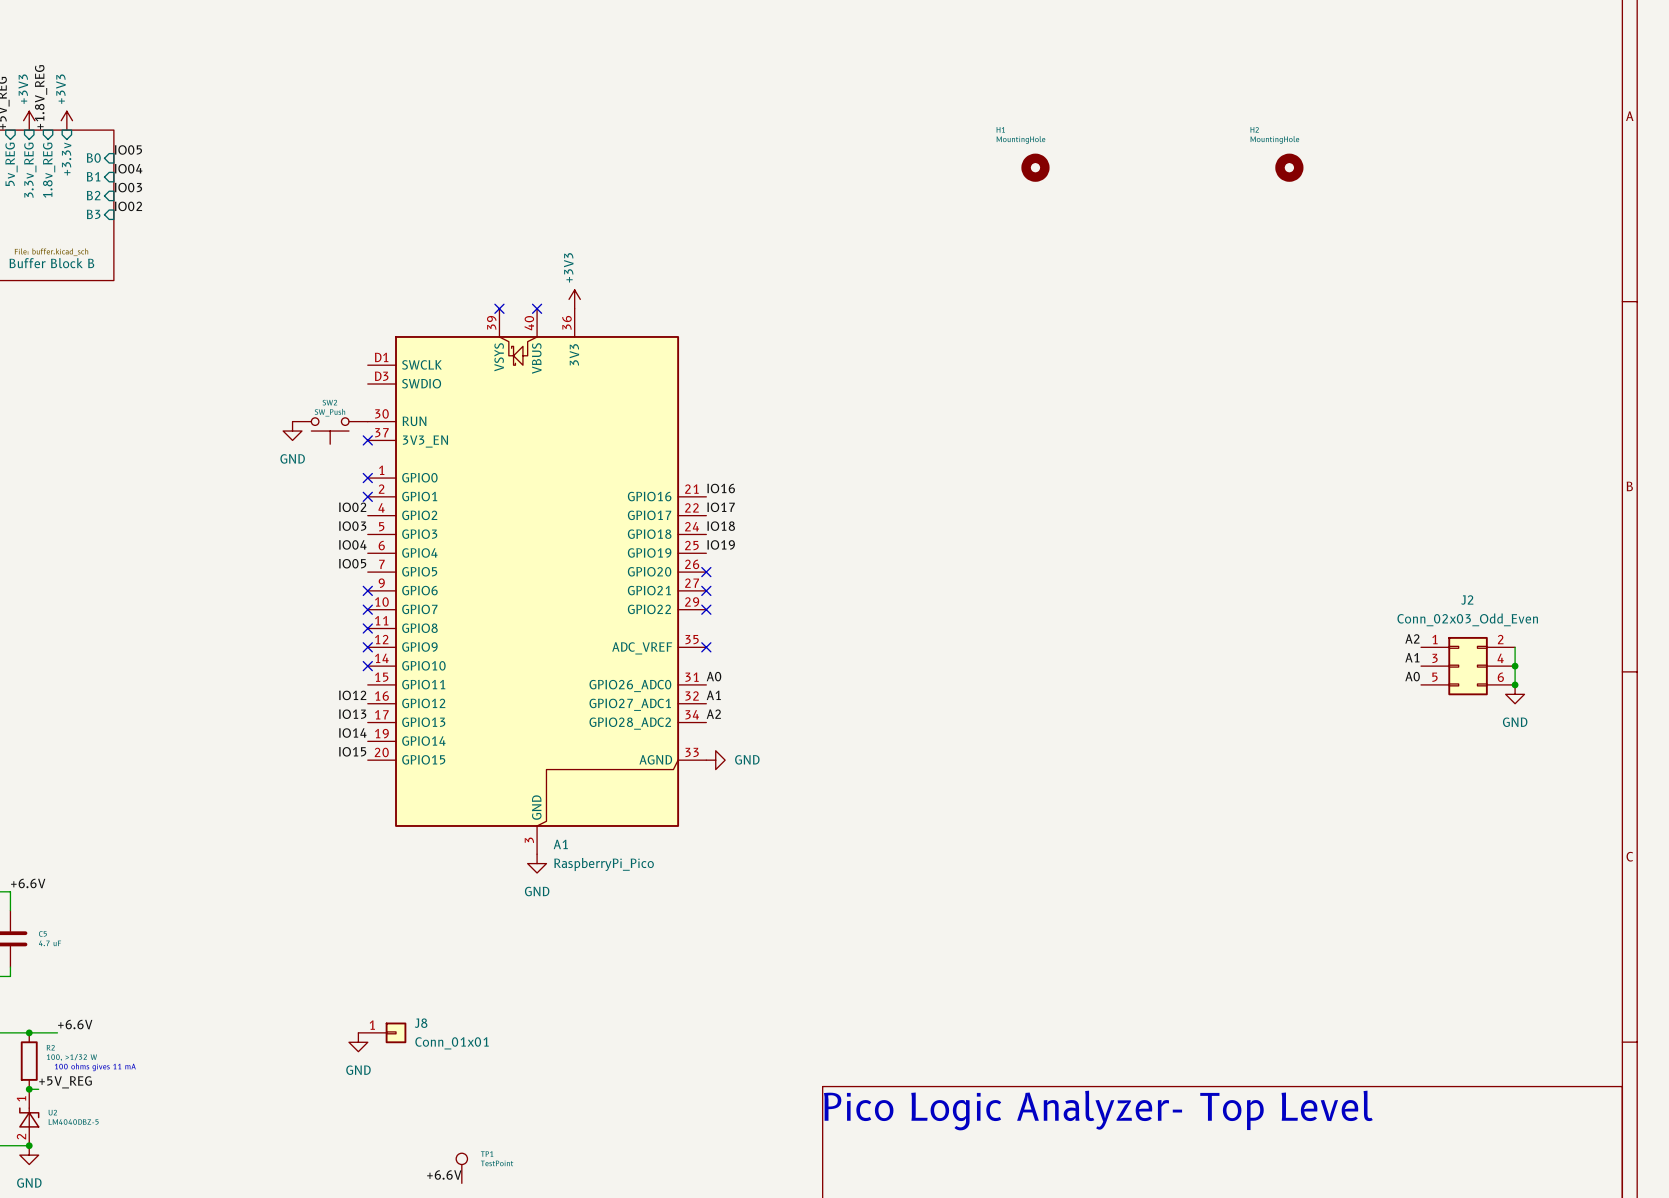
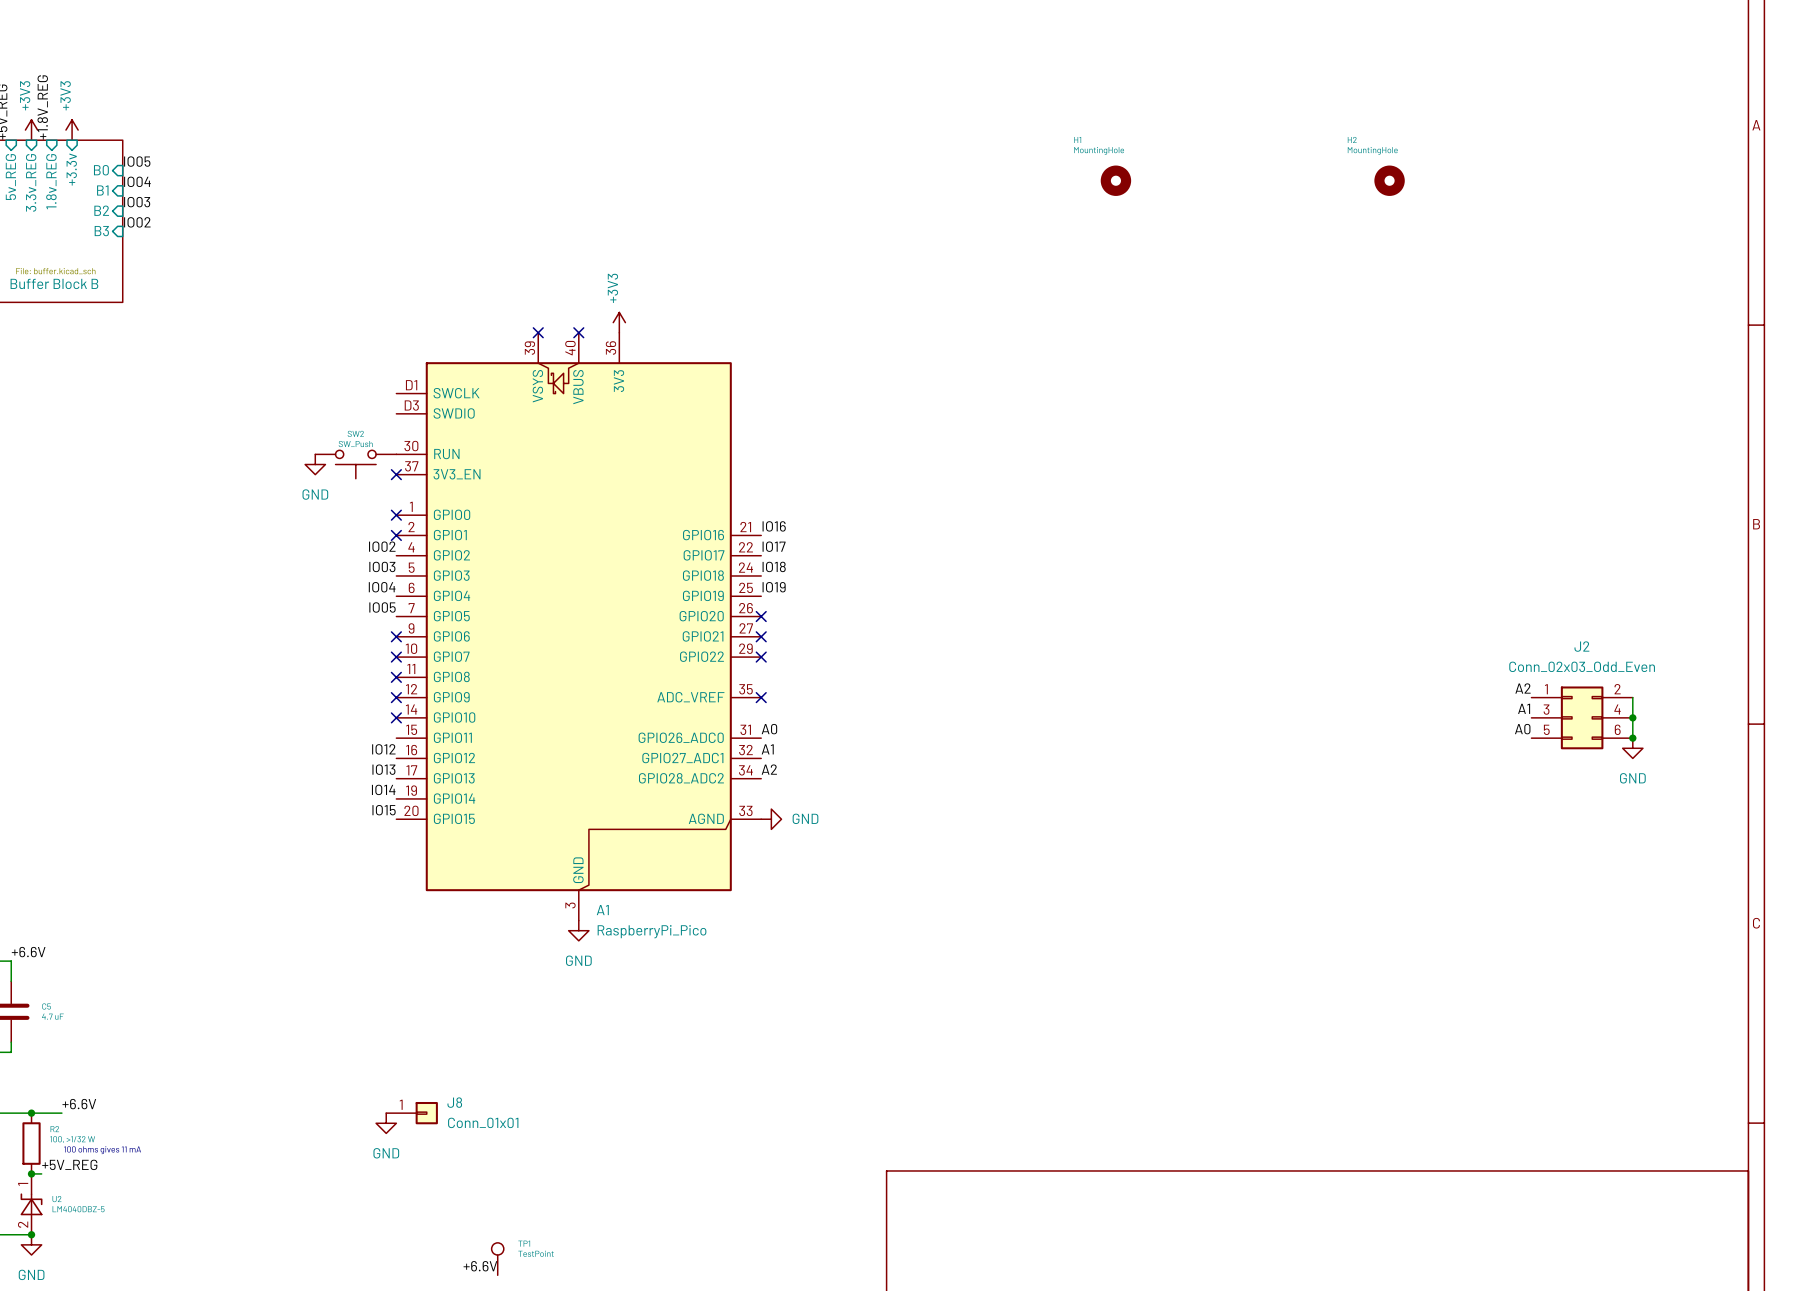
text: Pico Logic Analyzer- Top Level (1098, 1110) -> none

